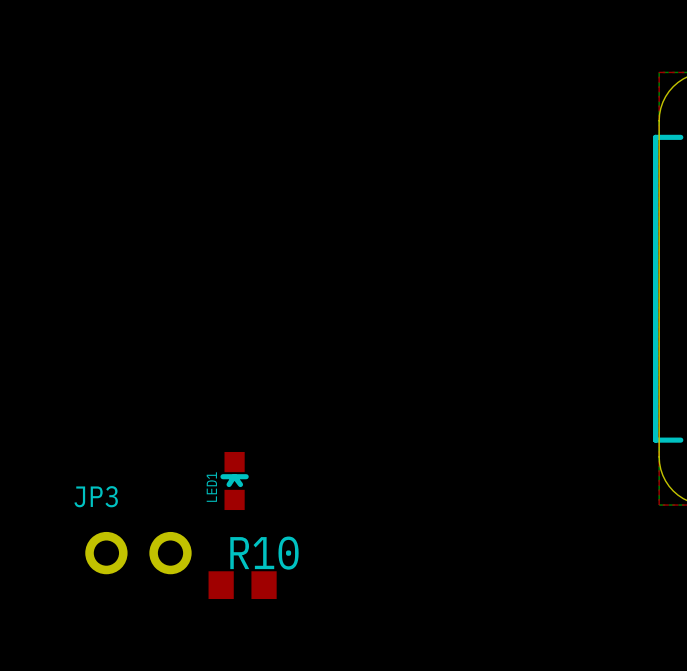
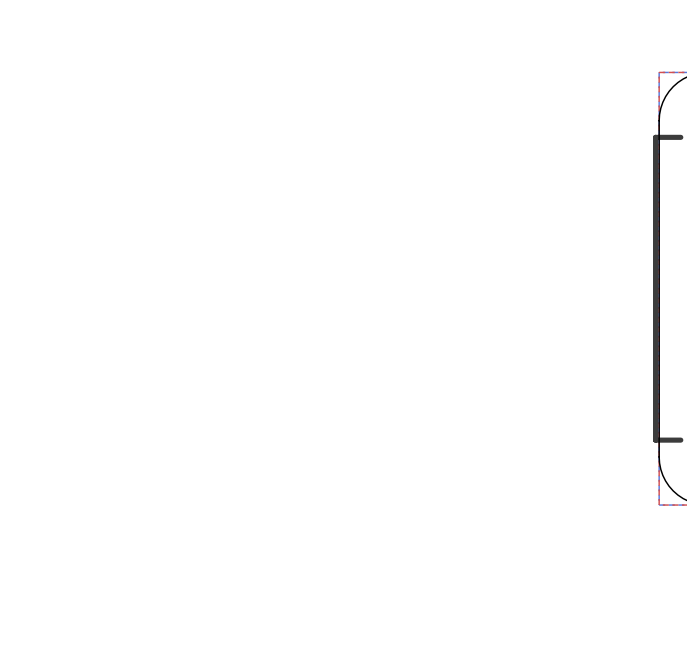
LED1: (234, 481) -> none
JP3: (138, 553) -> none
R10: (242, 585) -> none

